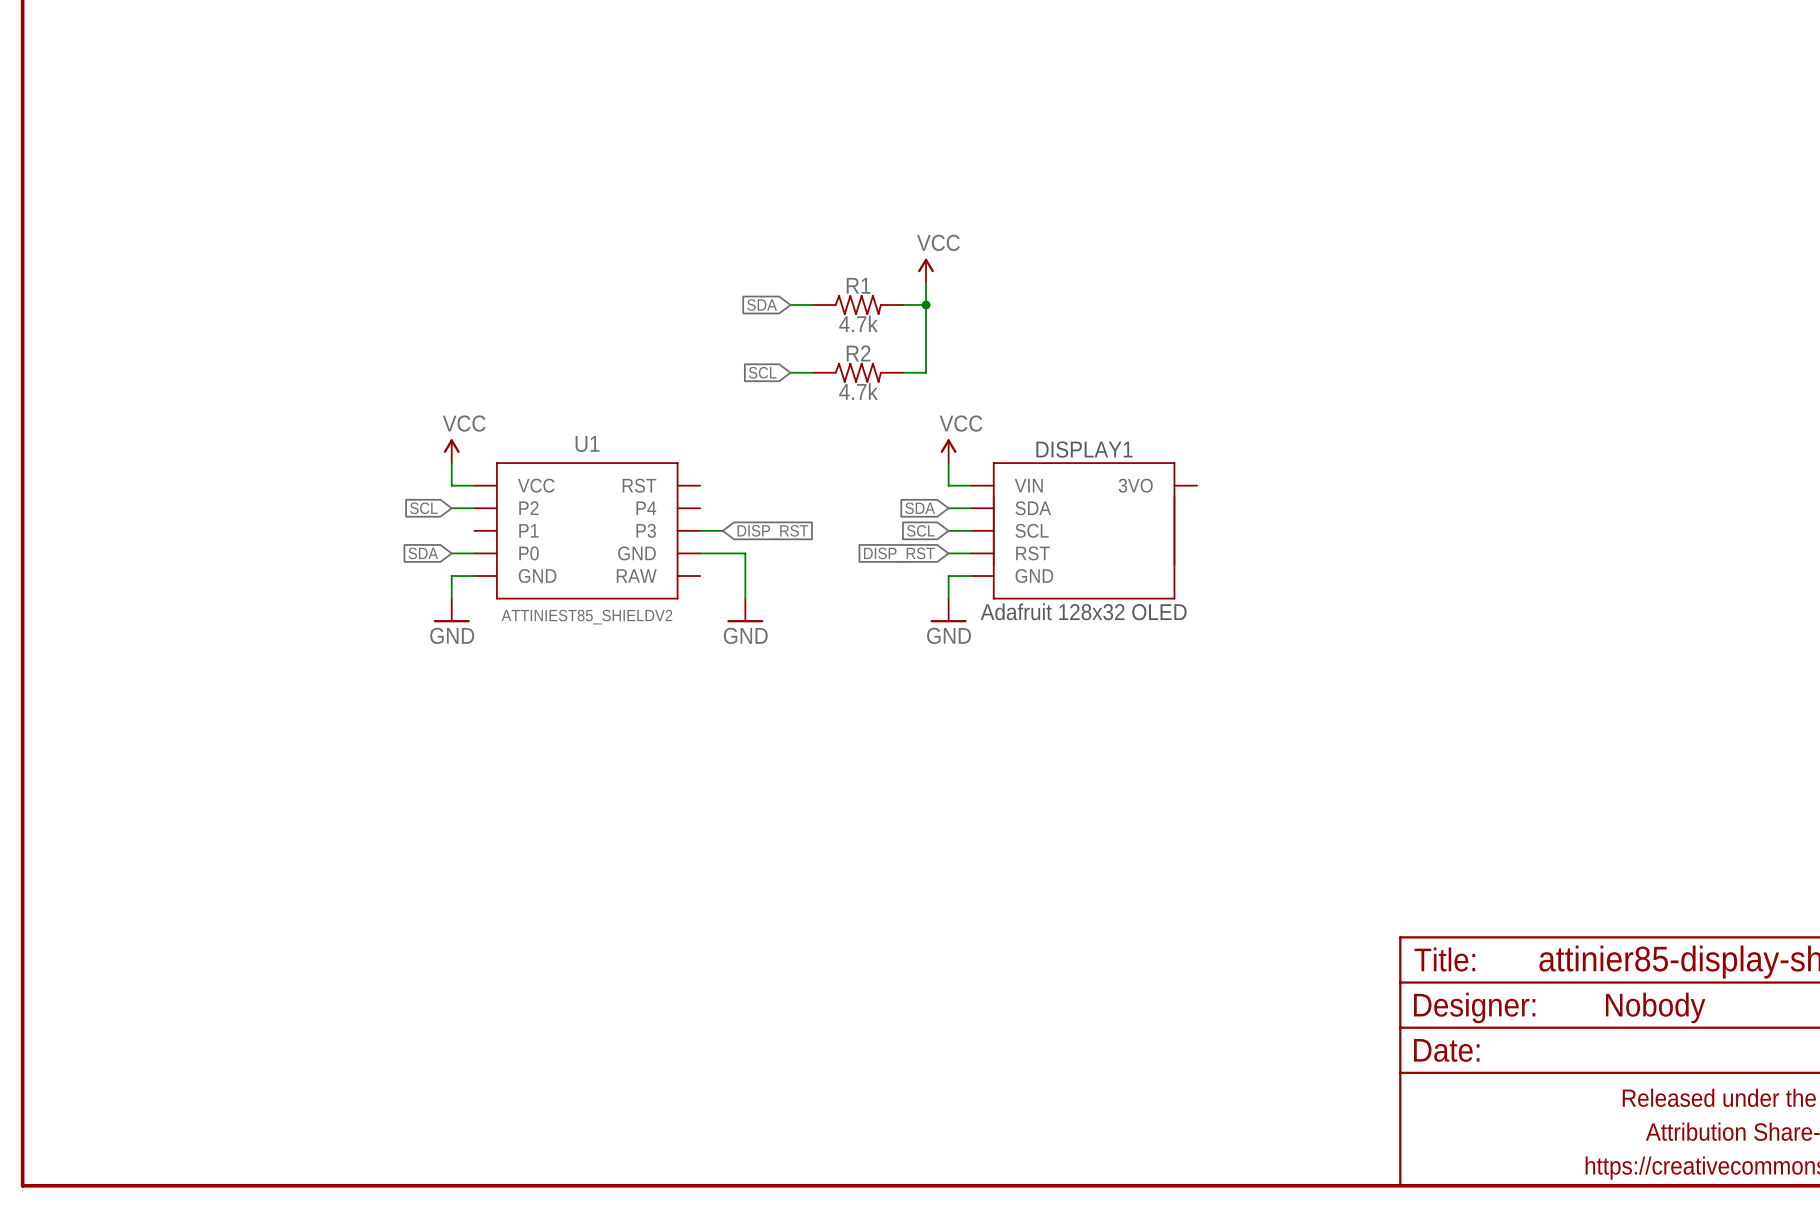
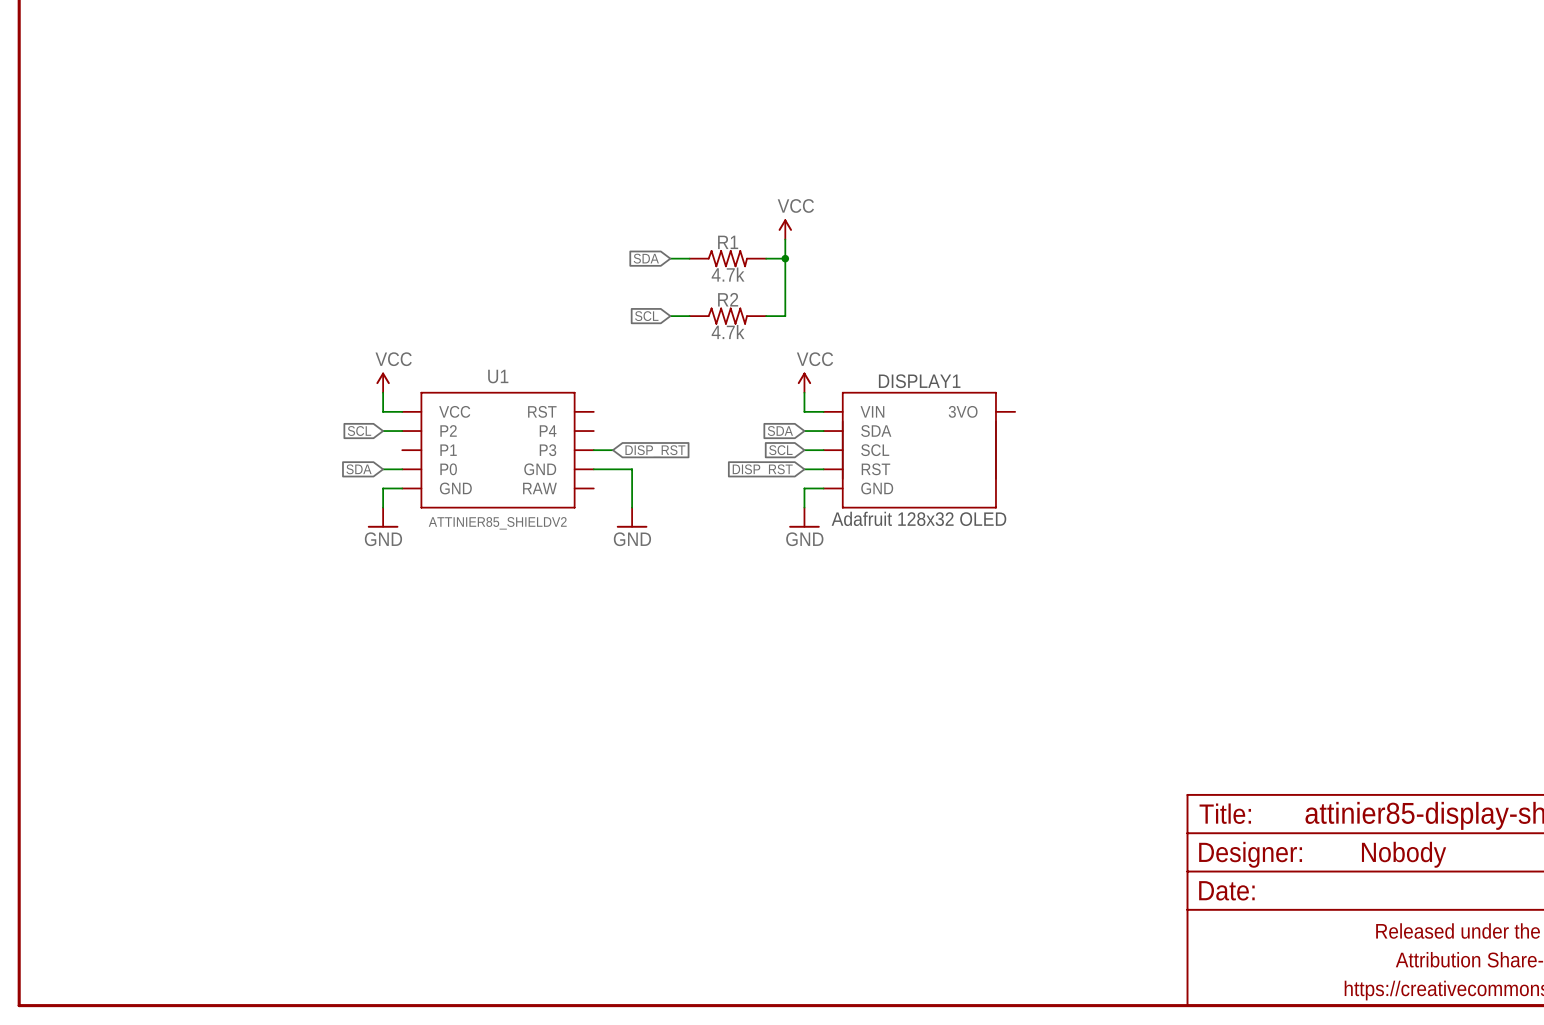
U1 value: ATTINIEST85_SHIELDV2 (586, 617) -> ATTINIER85_SHIELDV2 (497, 523)

